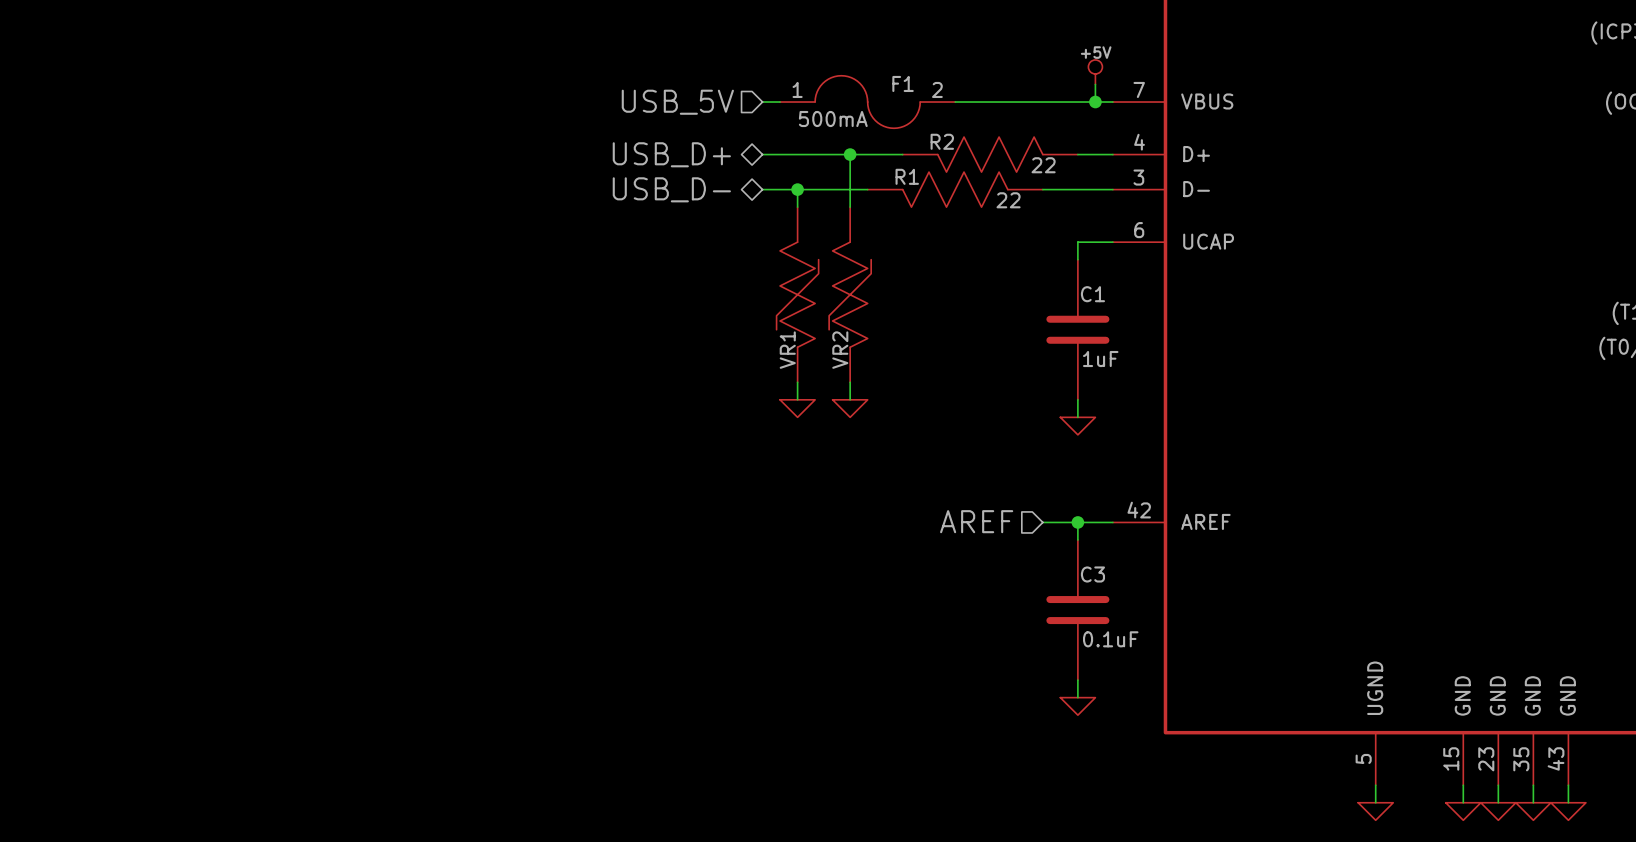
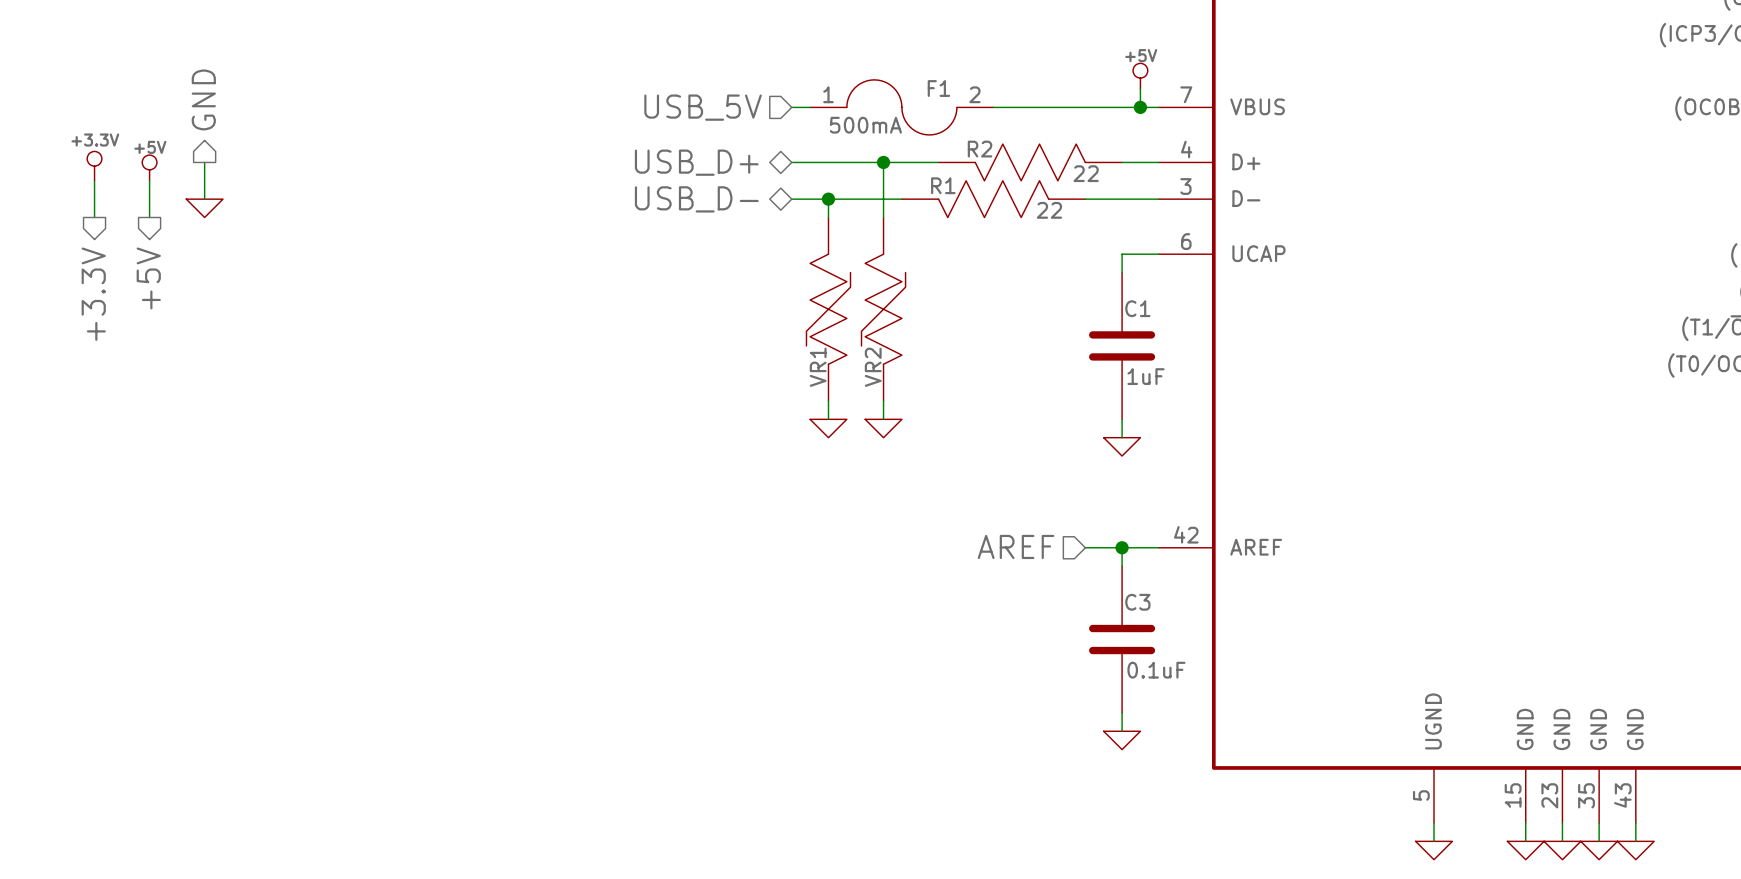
hierarchical label: none -> GND (203, 99)
wire: none -> (204, 162) (204, 199)
power symbol: none -> +3.3V (94, 166)
power symbol: none -> +5V (149, 167)
wire: none -> (94, 180) (94, 217)
wire: none -> (149, 180) (149, 217)
power symbol: none -> (204, 208)
hierarchical label: none -> +5V (148, 278)
hierarchical label: none -> +3.3V (93, 294)

